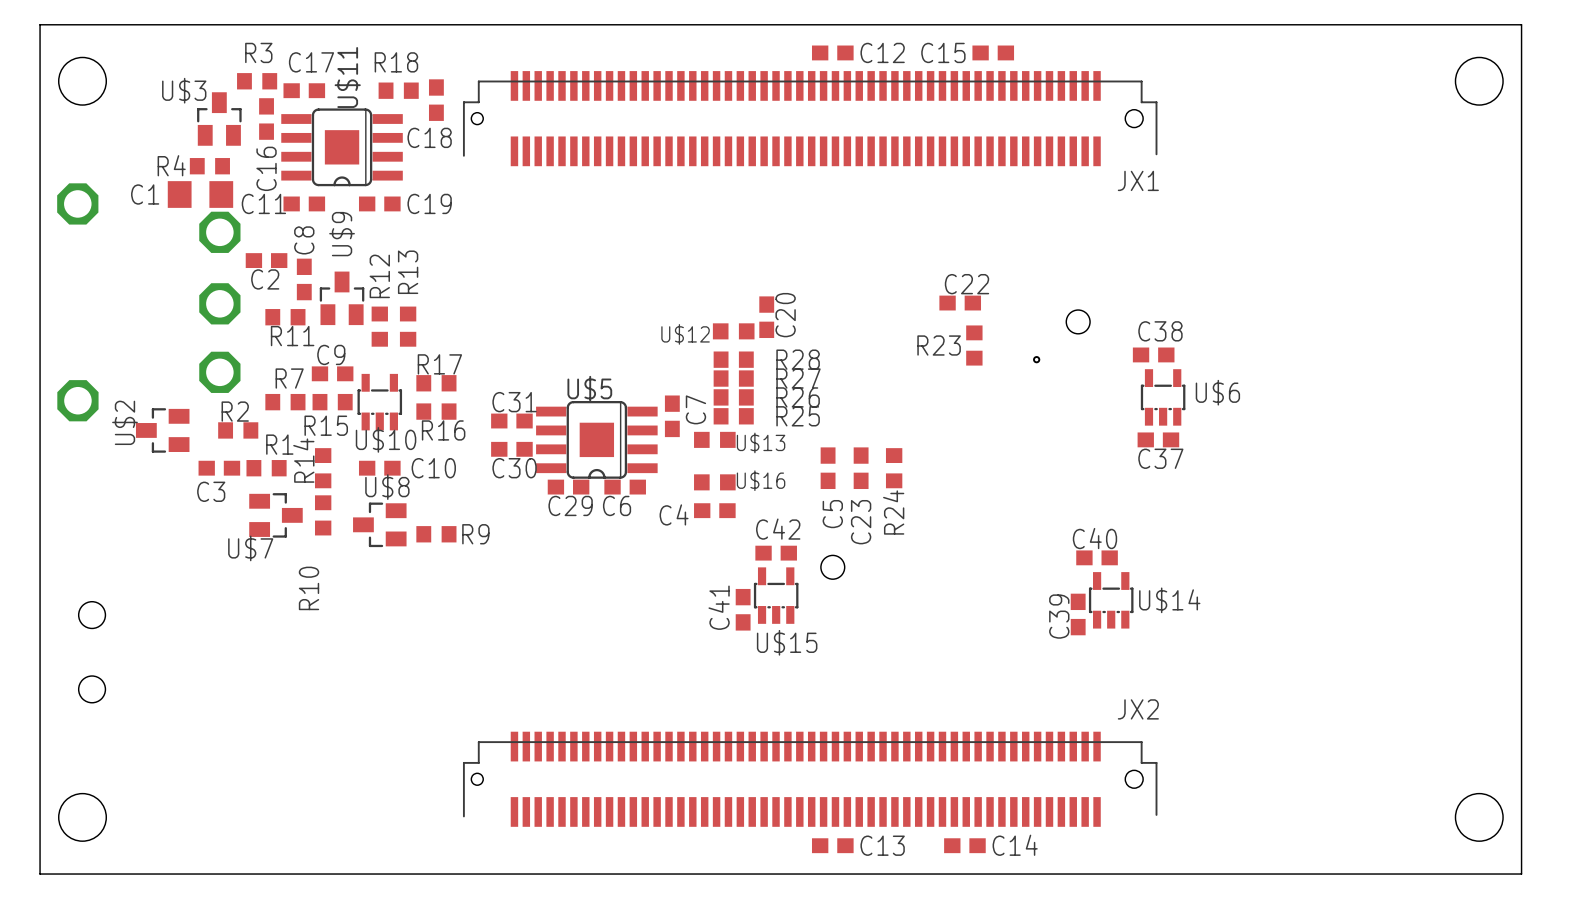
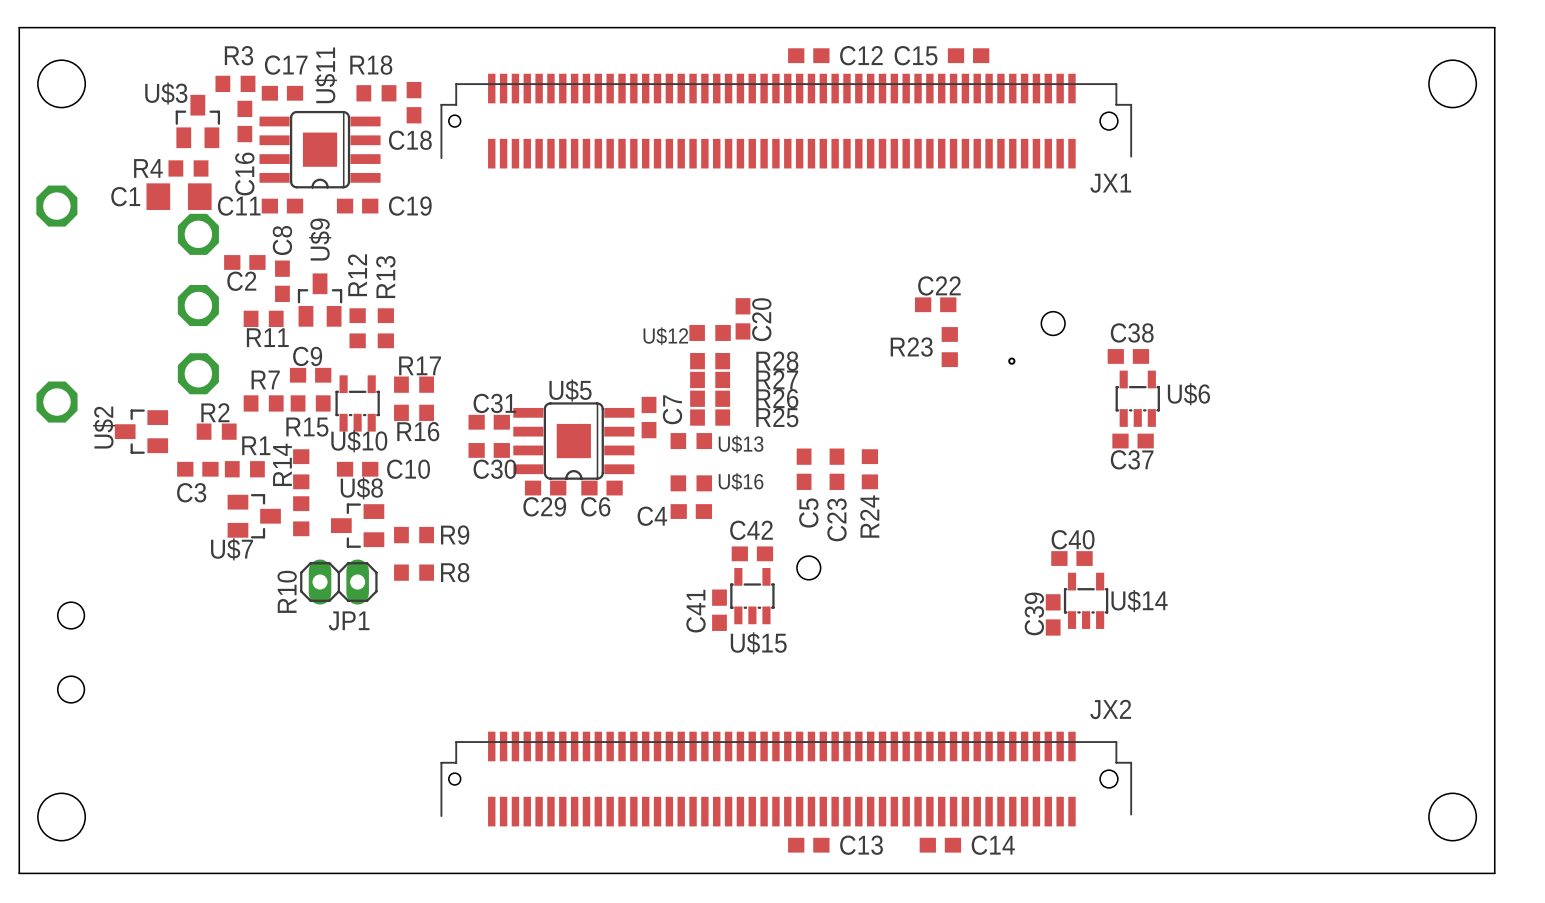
R8: none -> (414, 572)
JP1: none -> (338, 582)

